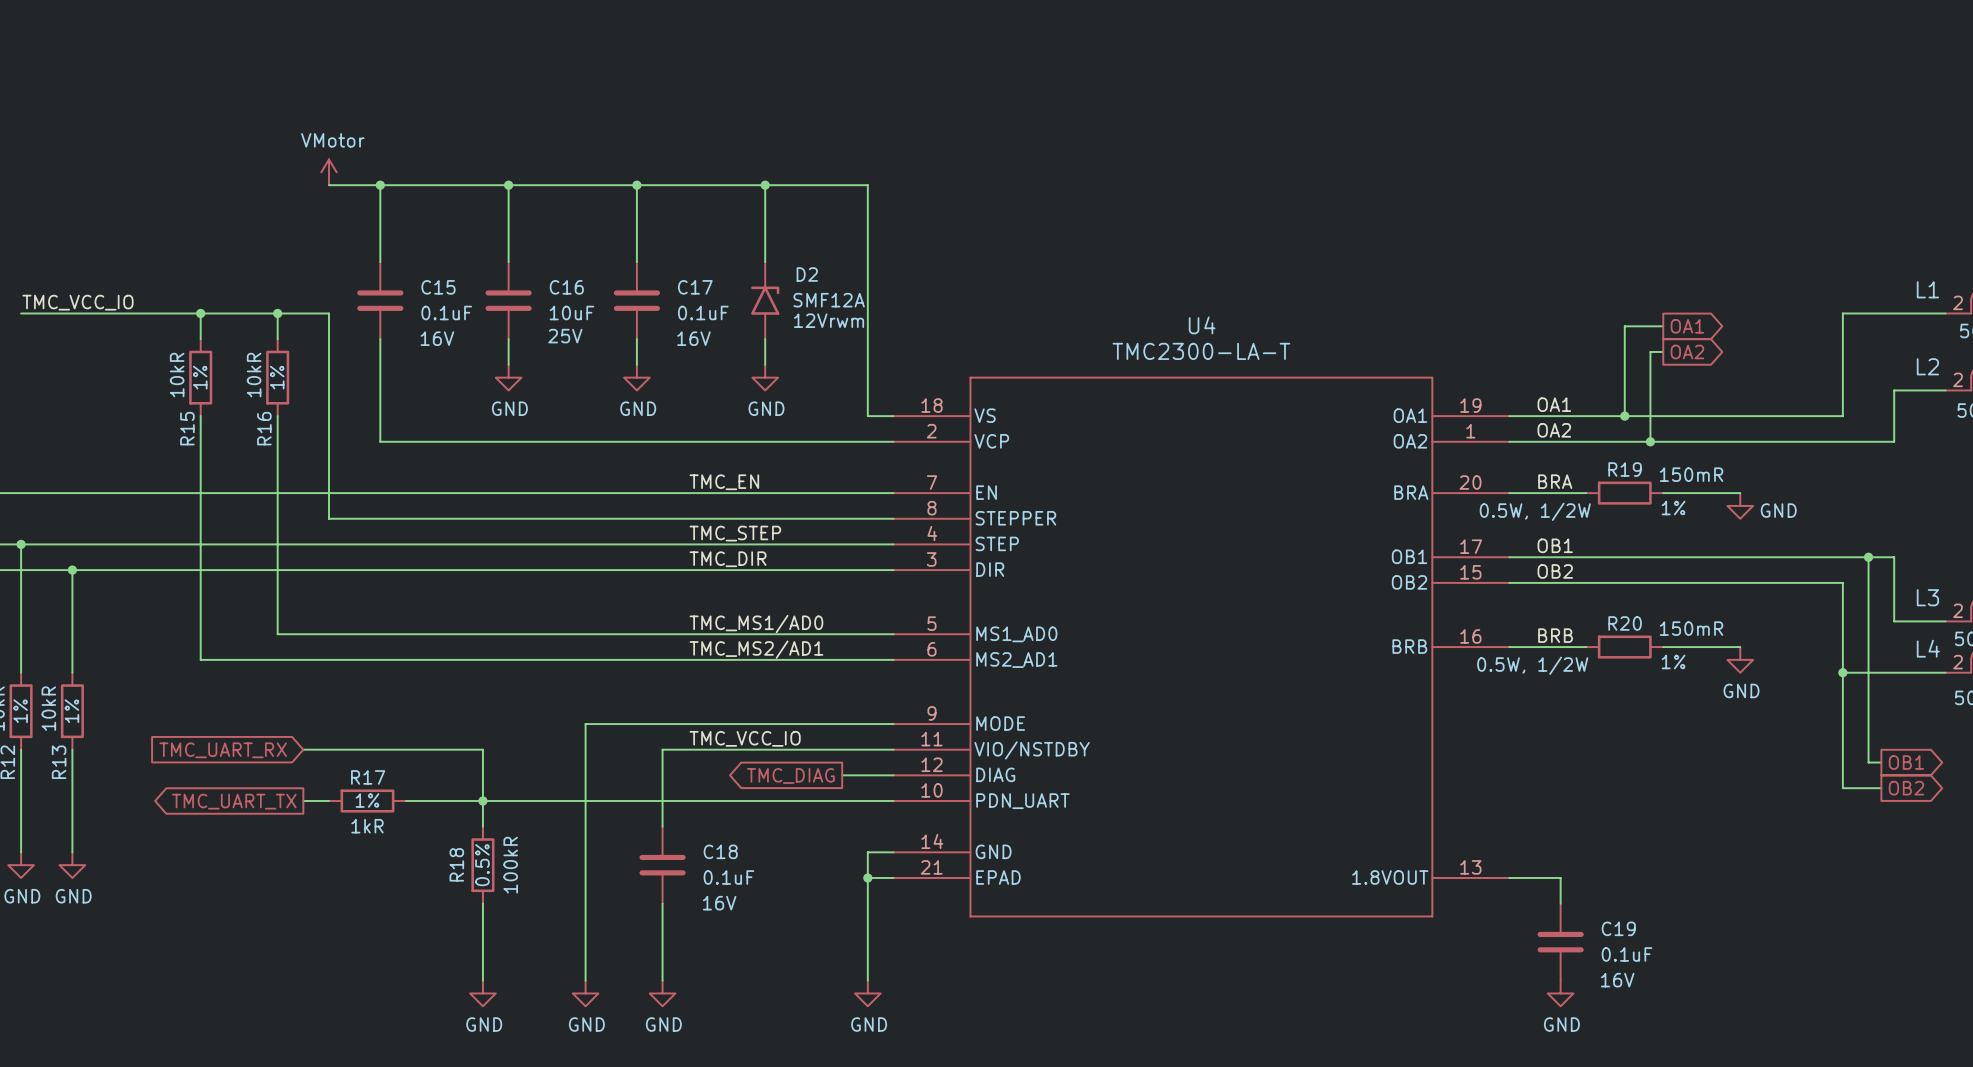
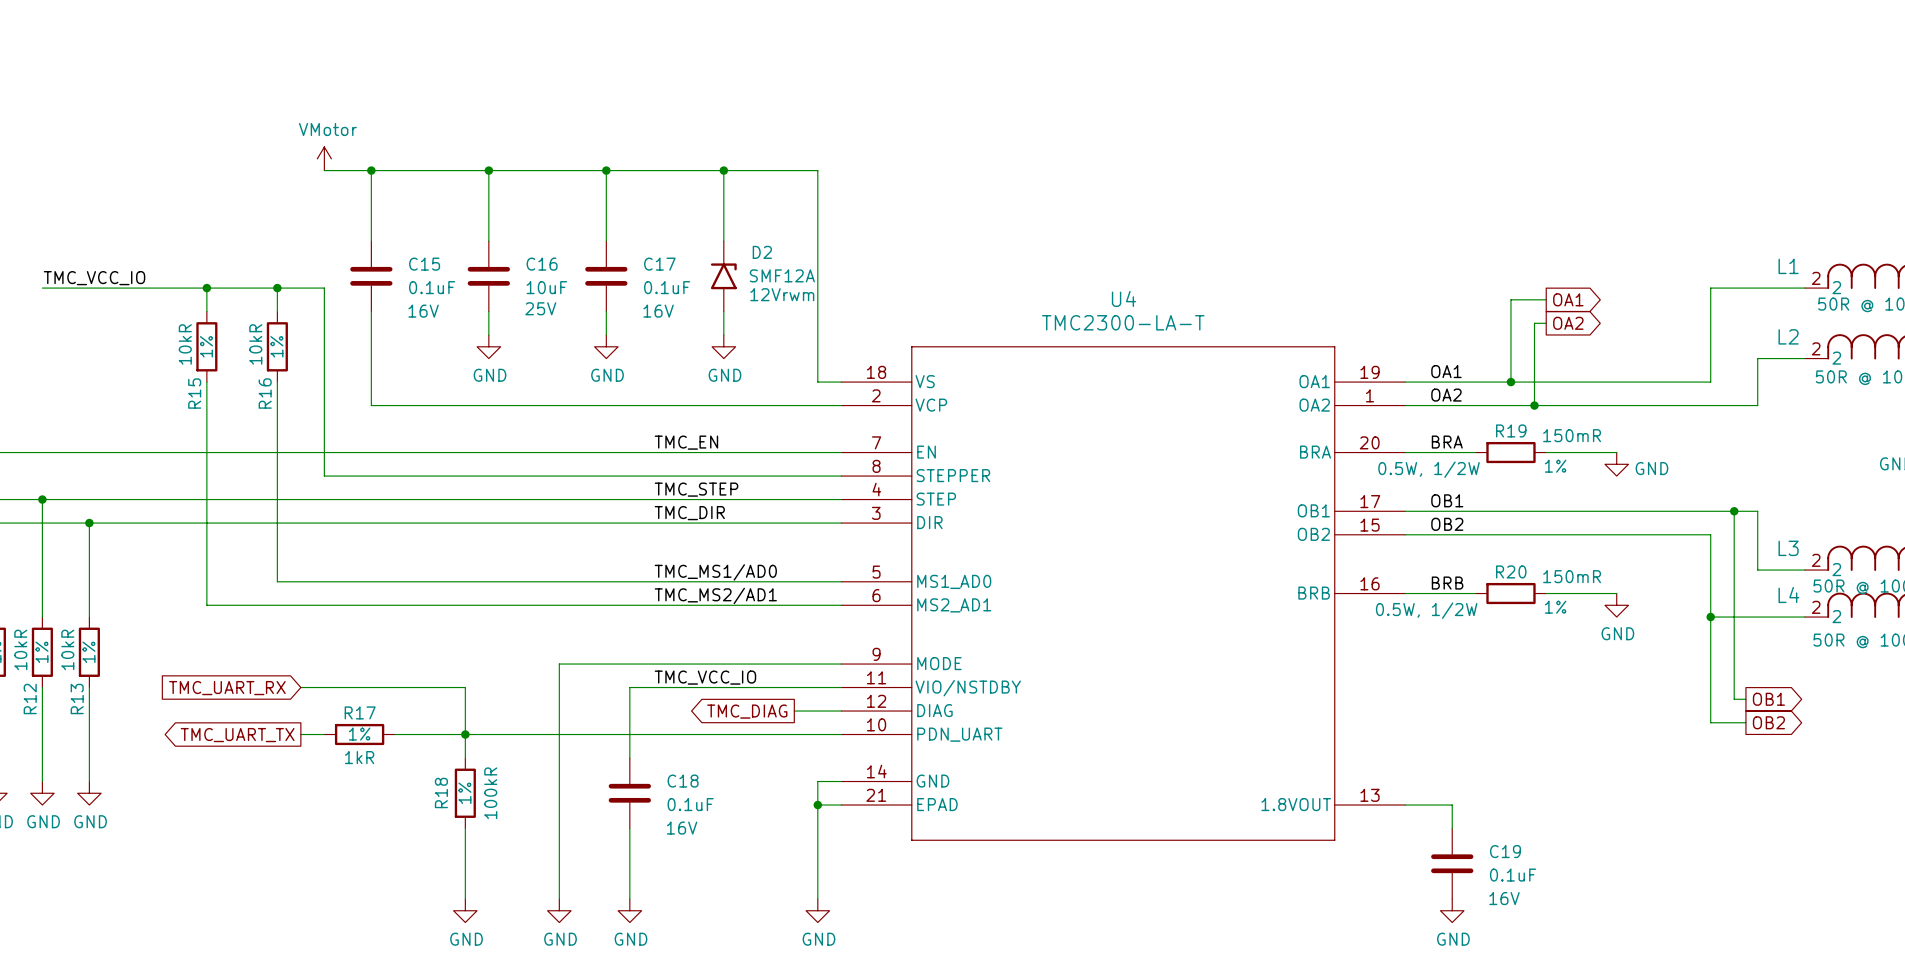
R18 text: 0.5% (482, 865) -> 1% (464, 793)

